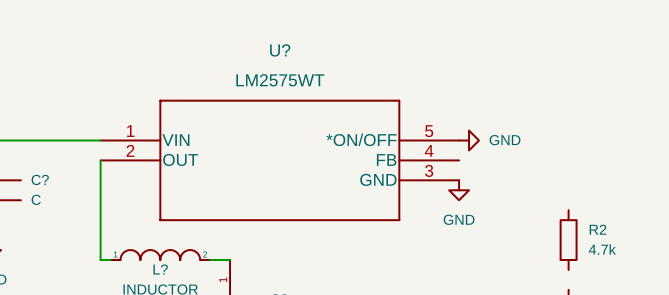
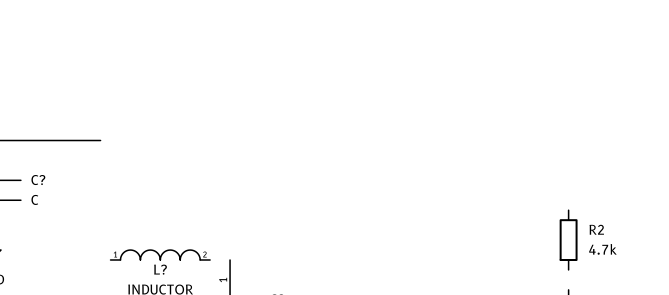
power symbol: GND (469, 140) -> none
wire: (100, 160) (100, 259) (110, 259) -> none
U?: LM2575WT (279, 160) -> none
power symbol: GND (459, 190) -> none
wire: (210, 259) (230, 259) -> none

